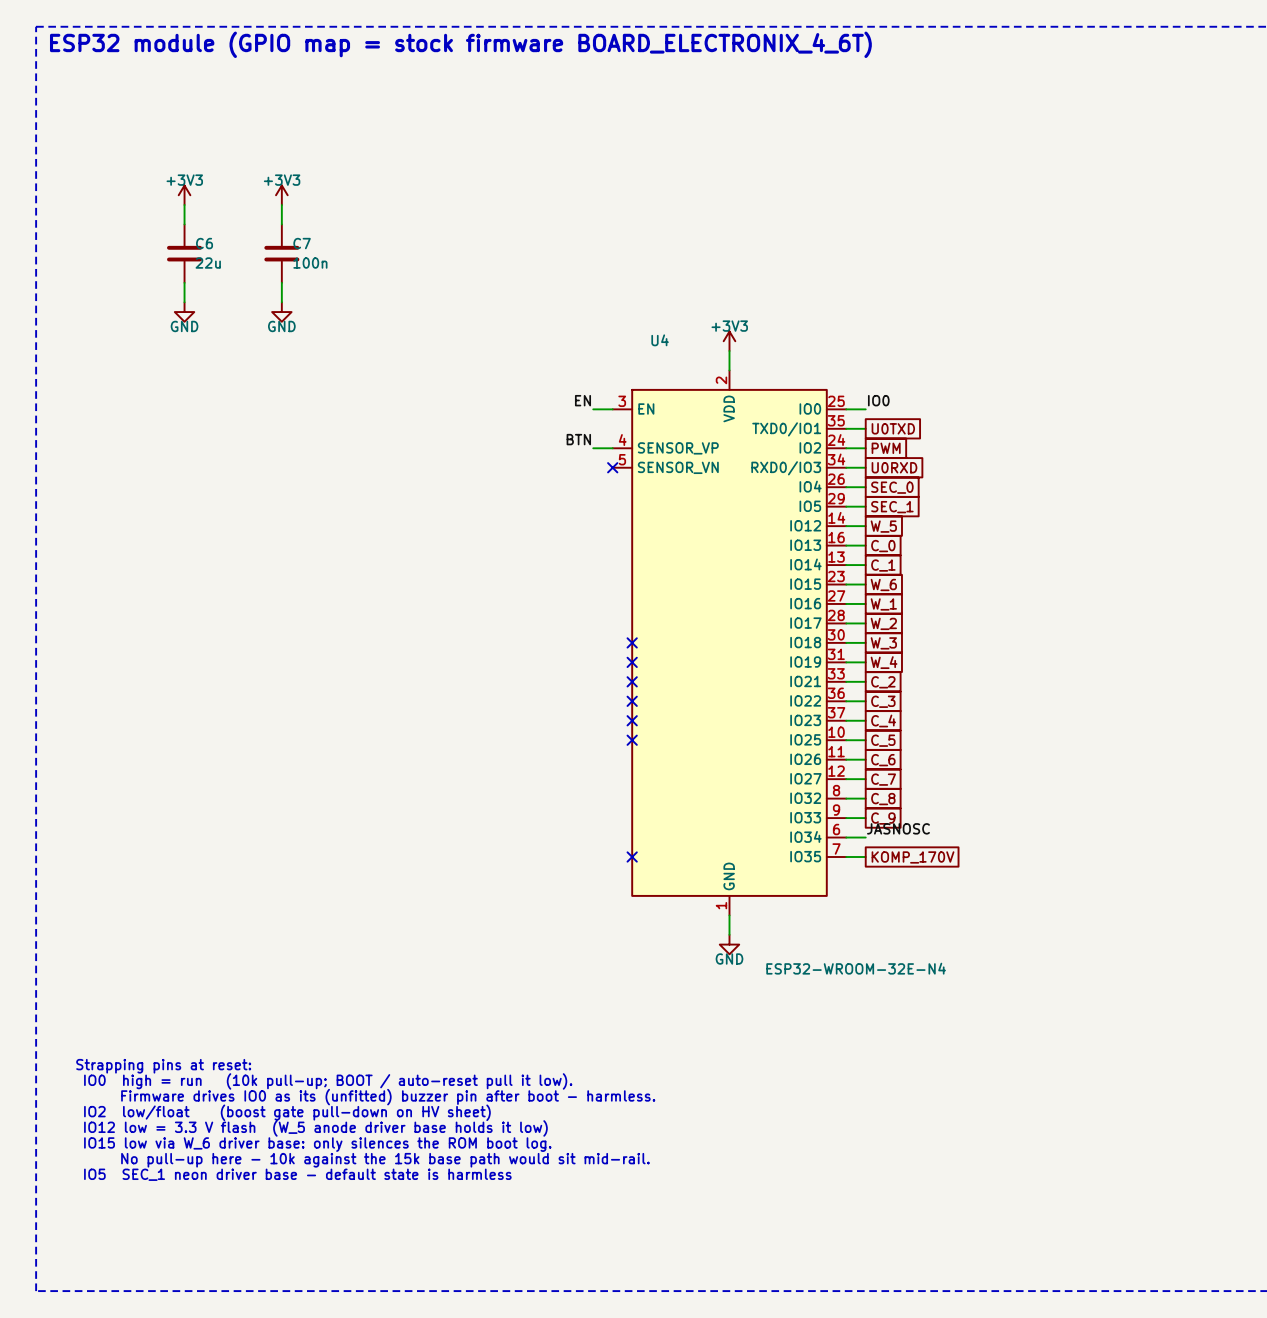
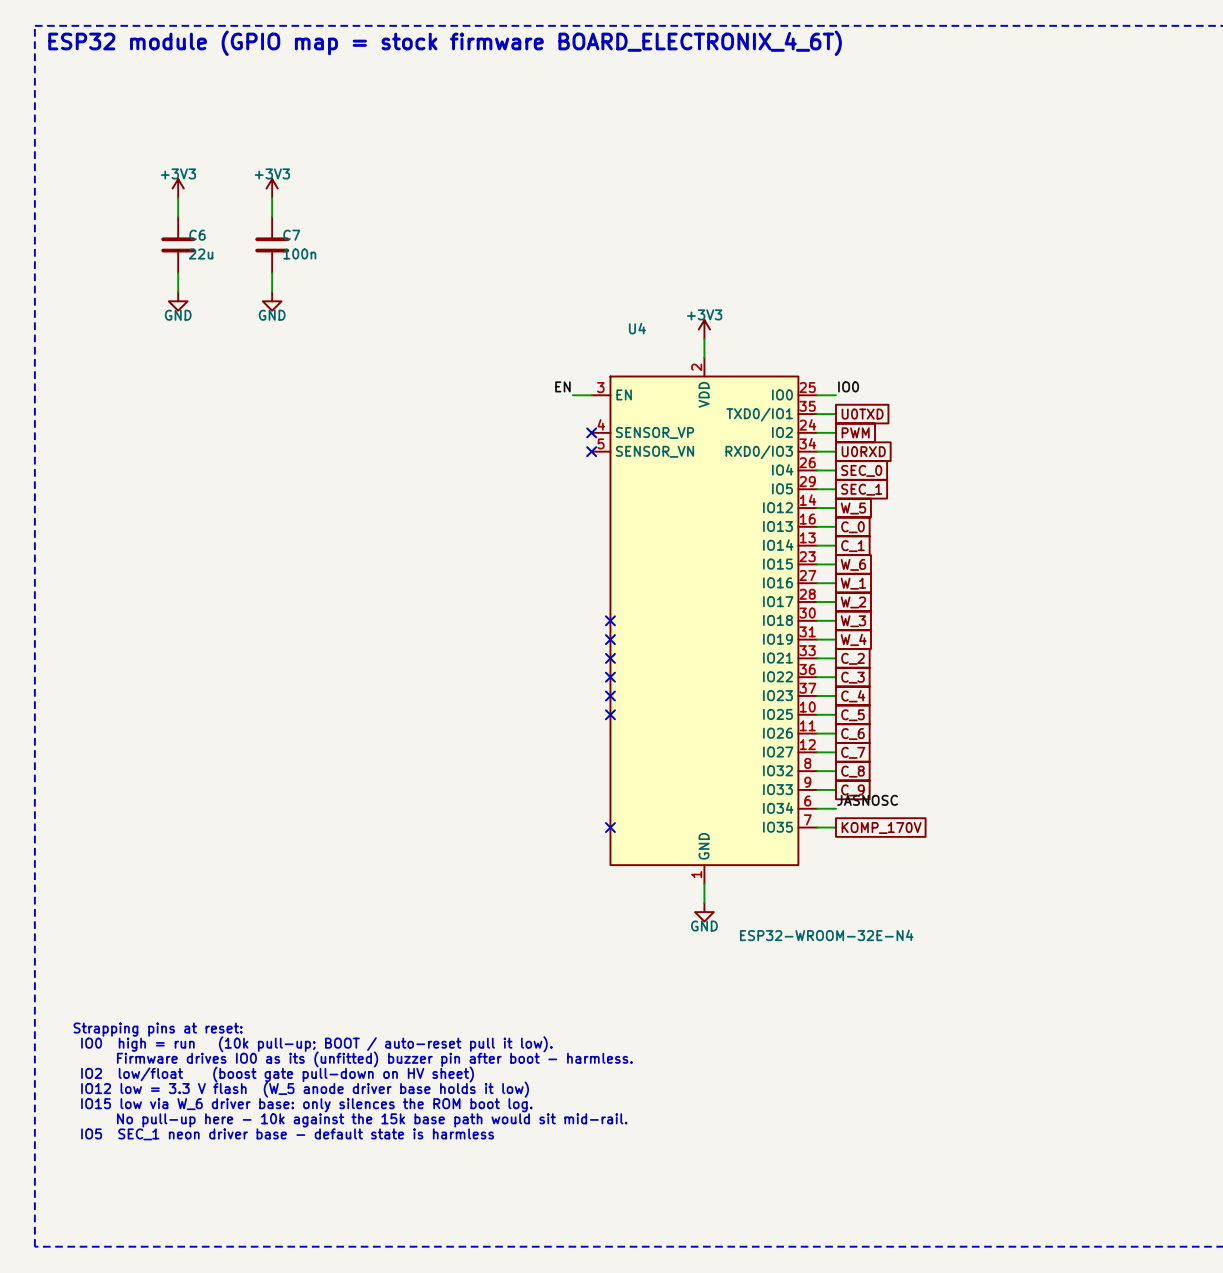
label: BTN (578, 439) -> none
wire: (593, 448) (612, 448) -> none
no-connect mark: none -> (591, 432)

